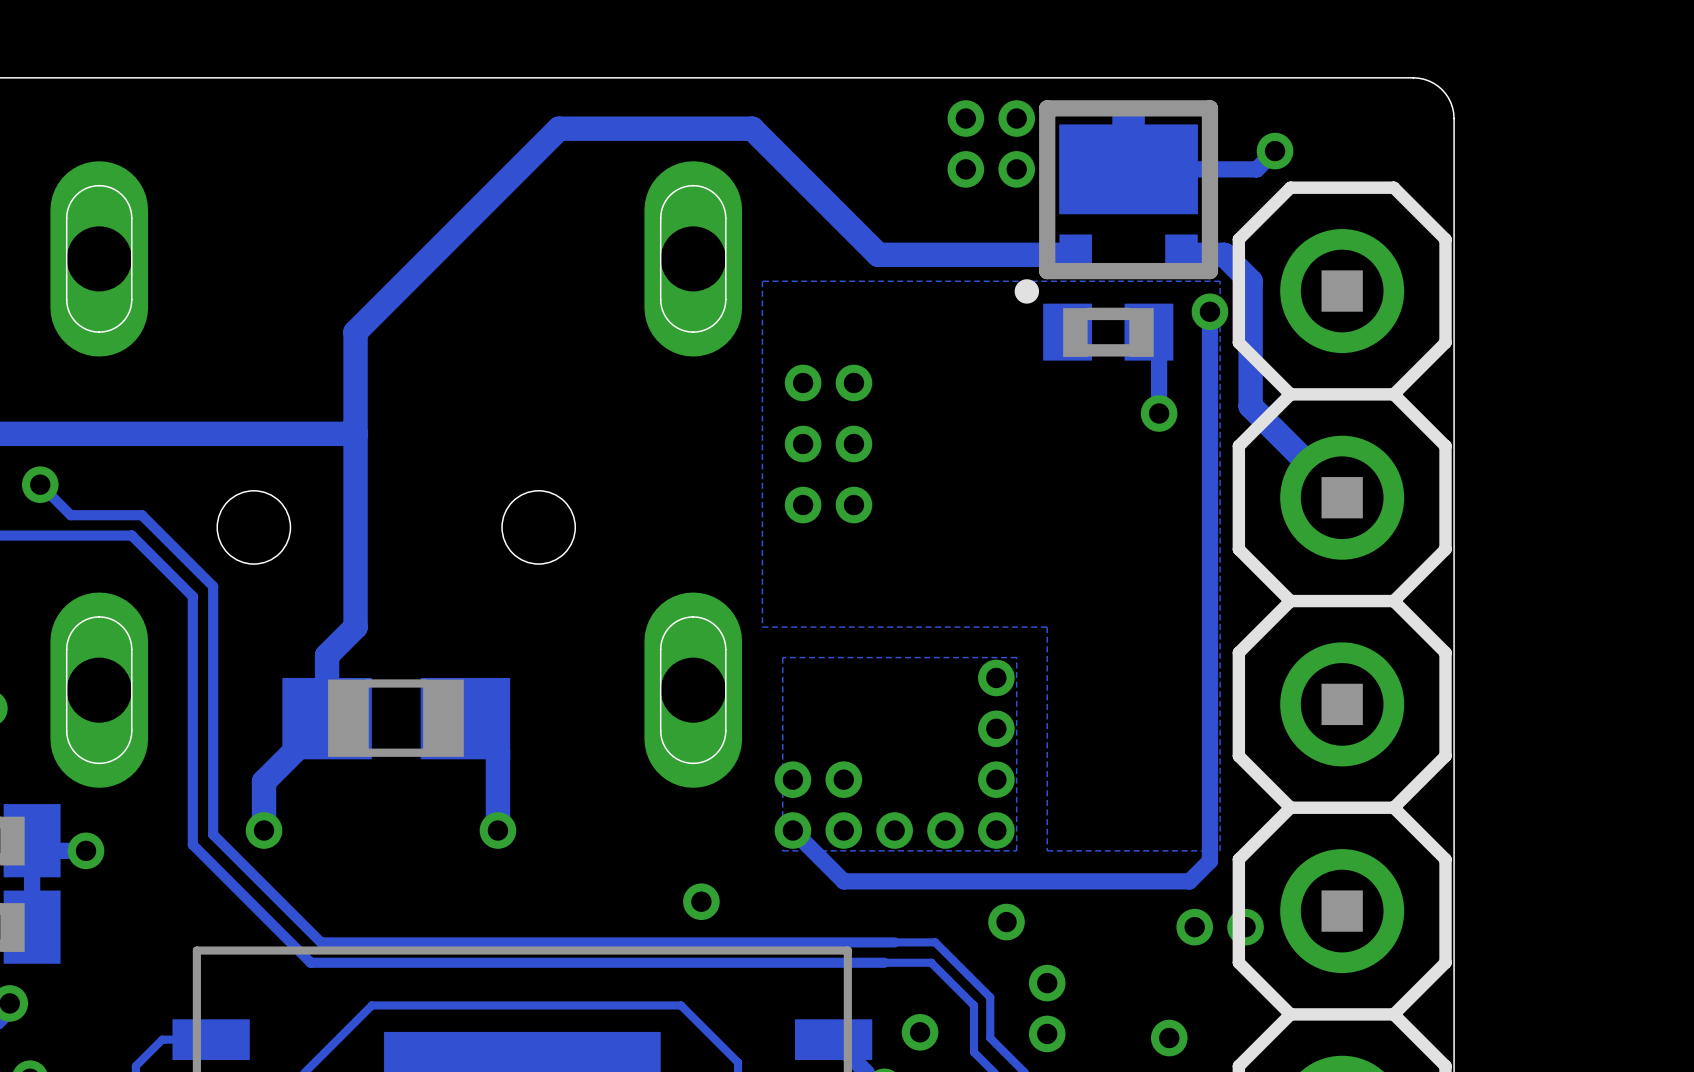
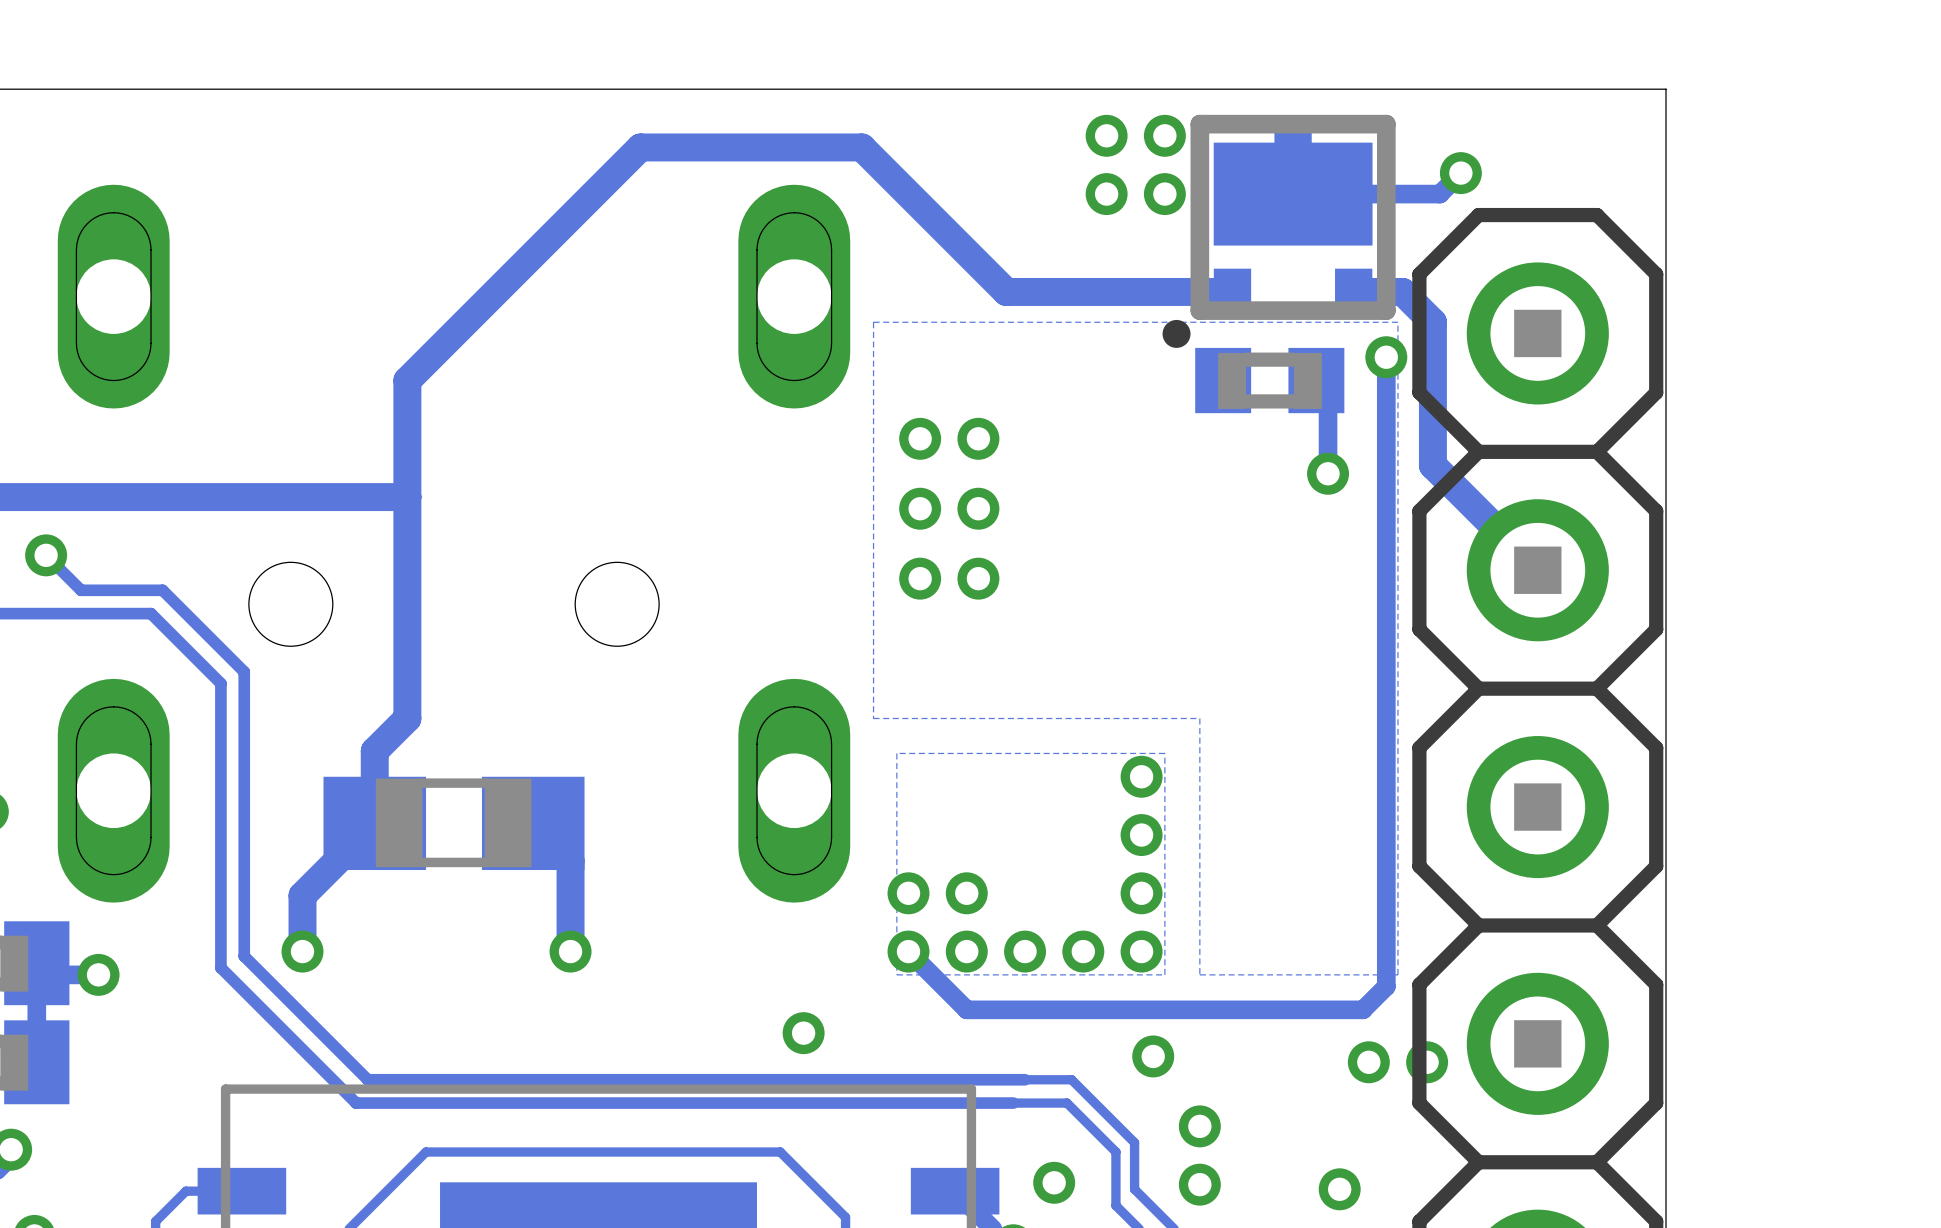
board edge: (1413, 77) (1428, 80) (1442, 89) (1450, 102) (1454, 118) -> (1619, 89) (1666, 89) (1666, 135)

